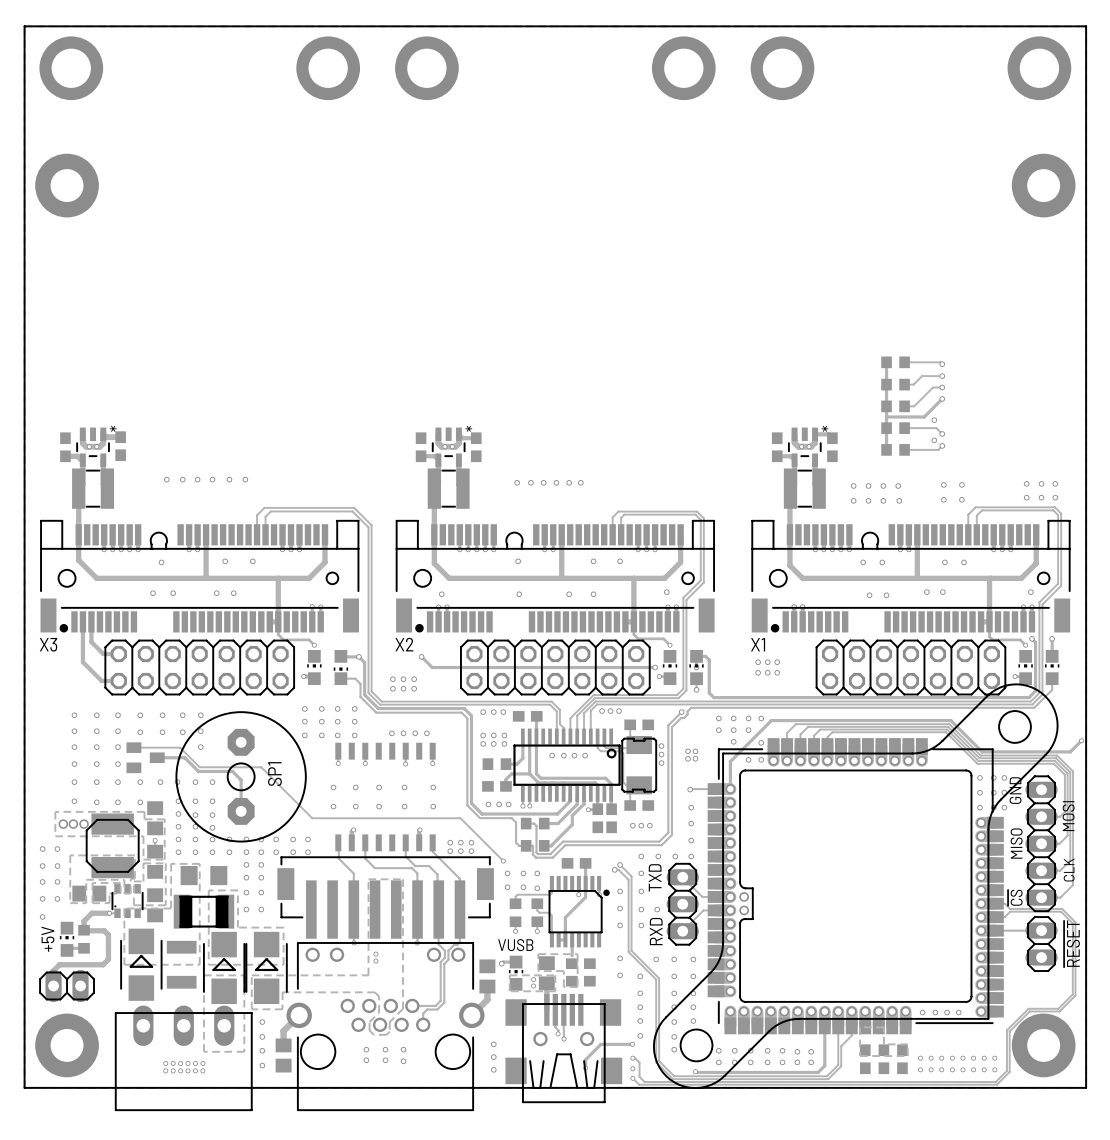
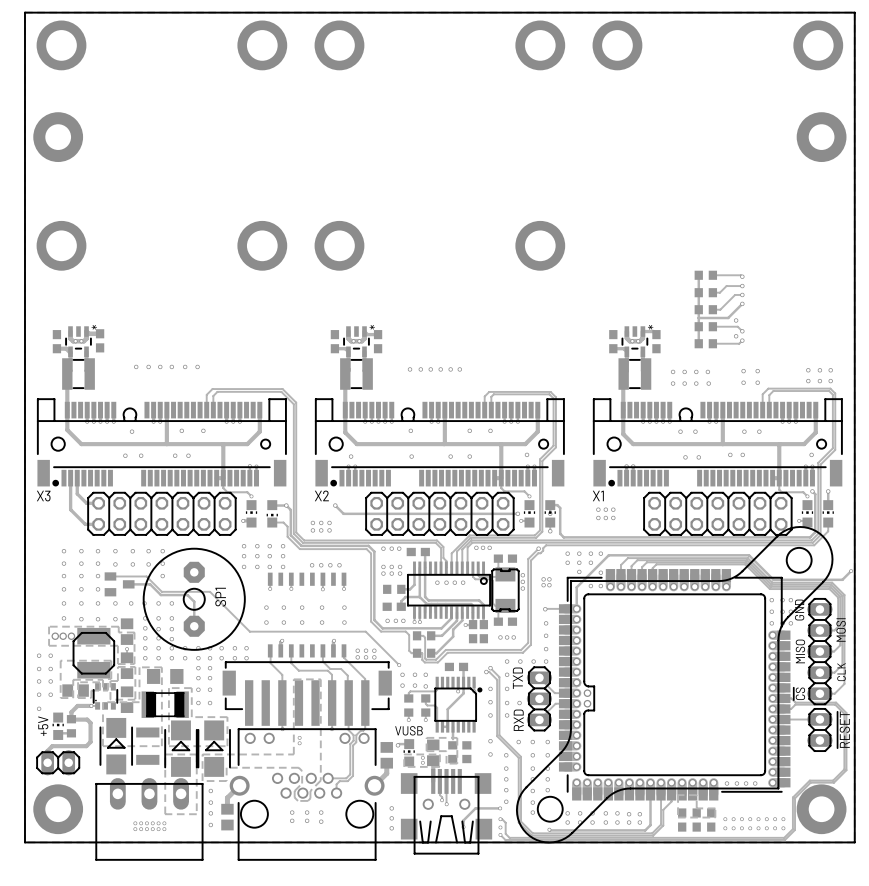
X3 footprint: [39, 36, 361, 633] -> [36, 20, 288, 487]
X2 footprint: [395, 36, 716, 633] -> [314, 20, 566, 487]

